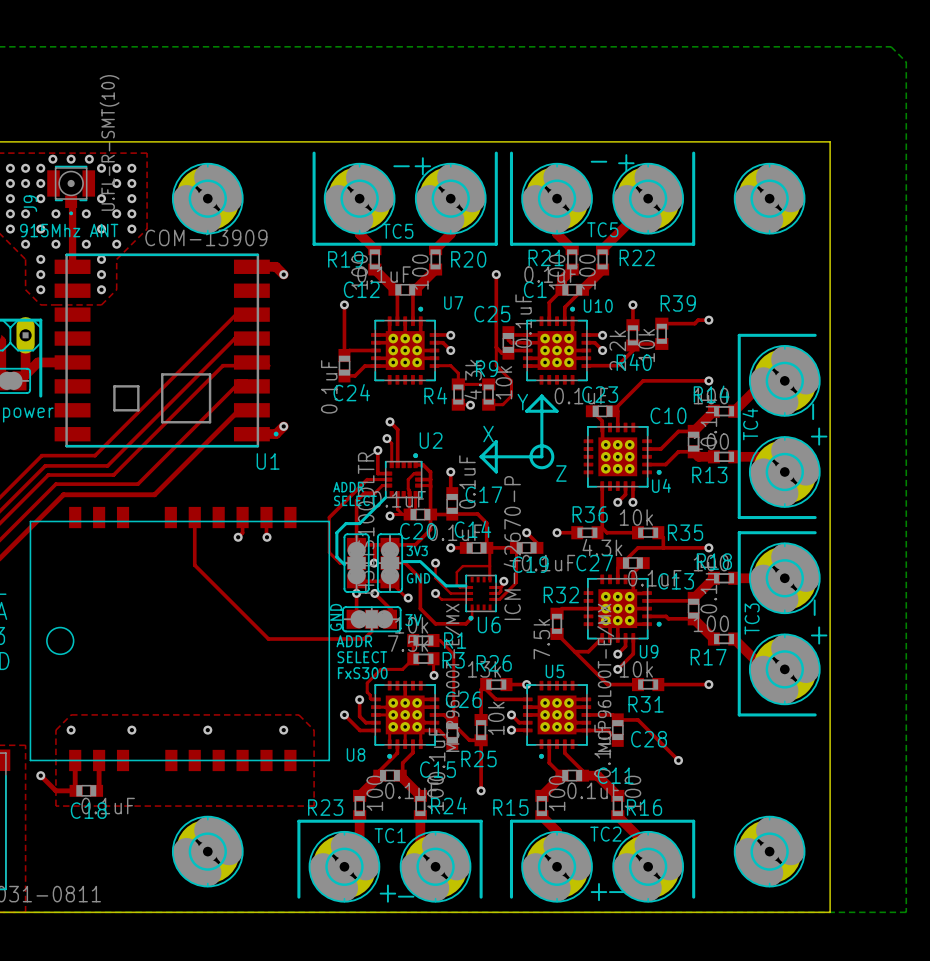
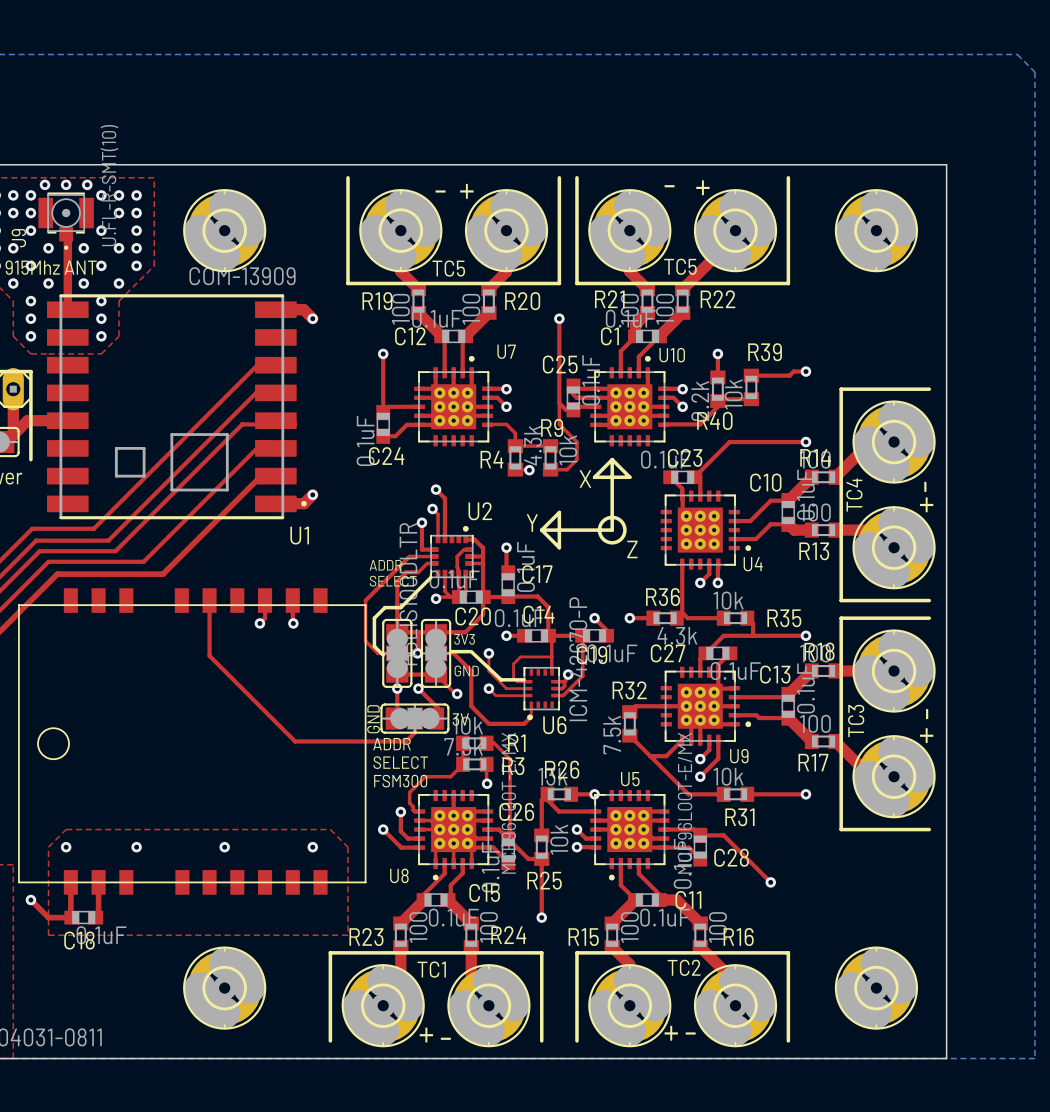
text position: Y (522, 402) -> Y (532, 523)
text position: X (488, 434) -> X (585, 479)
text: FxS300 (362, 673) -> FSM300 (400, 781)

